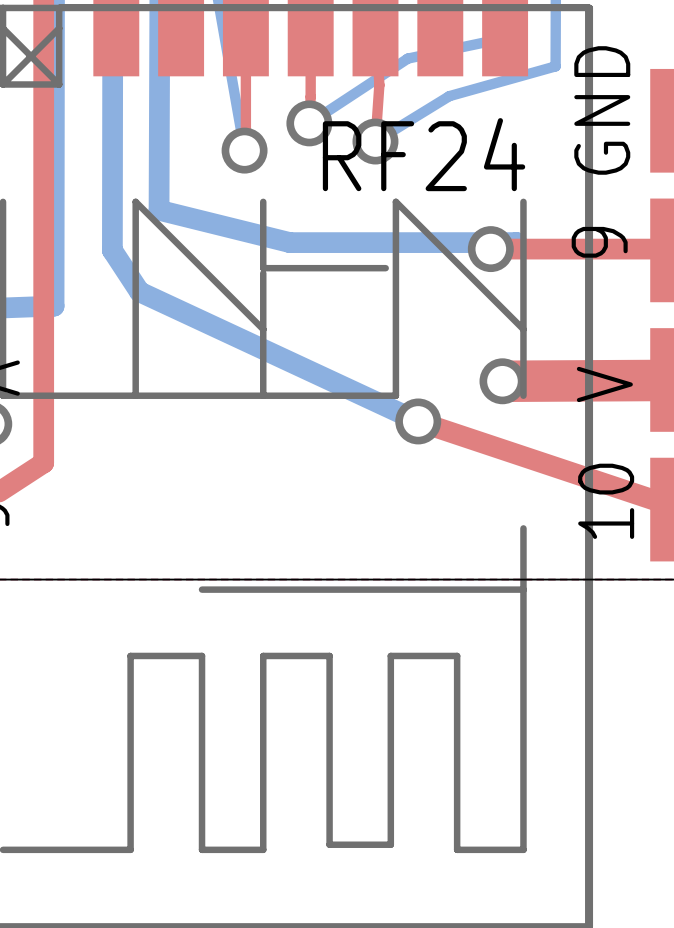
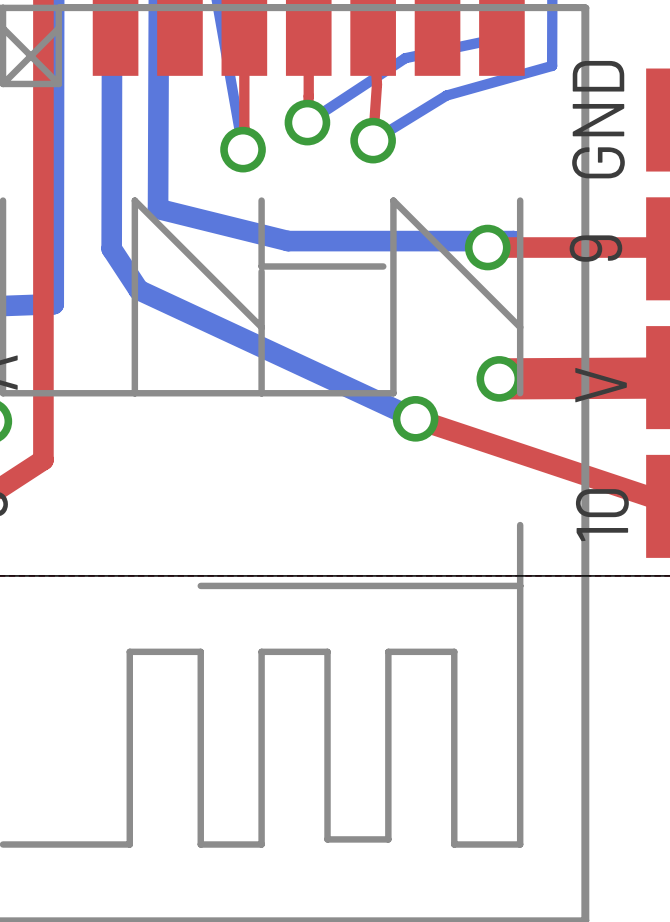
RF24 name: RF24 (424, 154) -> none

